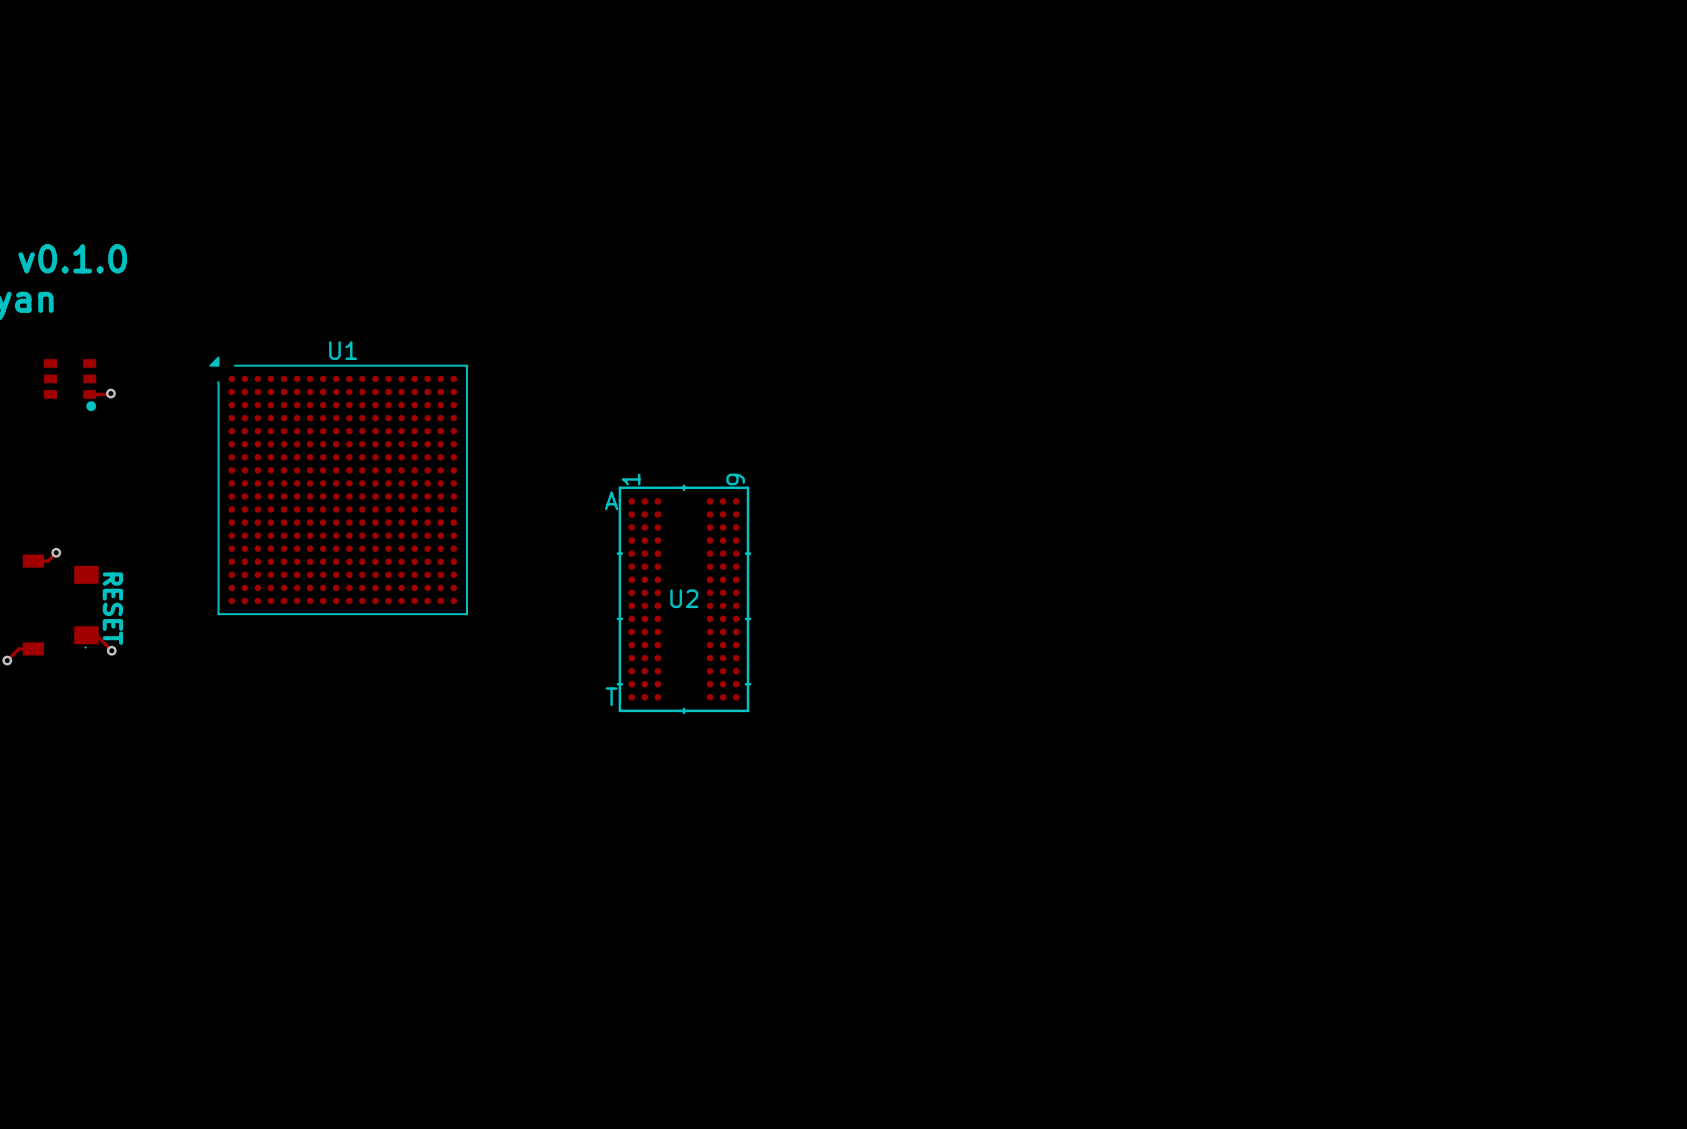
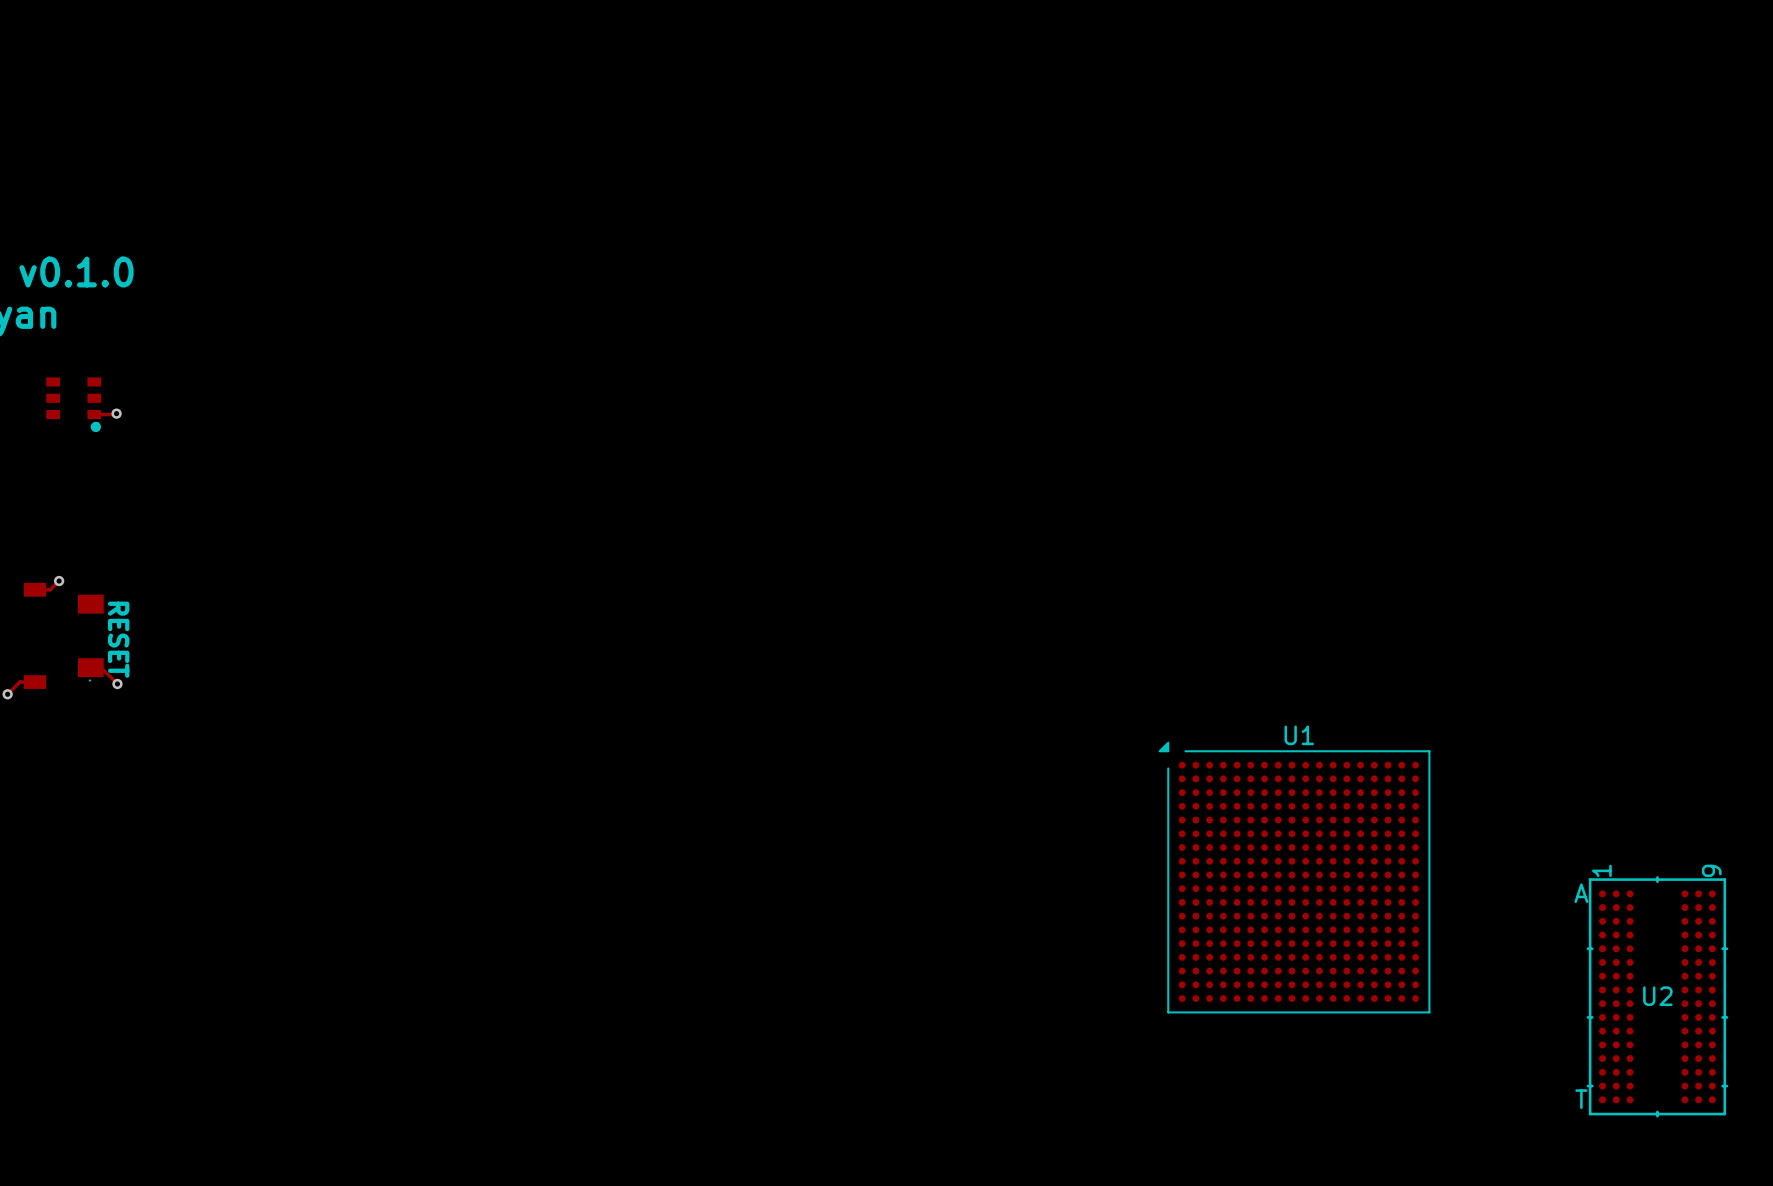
U1 position: (338, 485) -> (1294, 877)
U2 position: (683, 599) -> (1657, 996)

